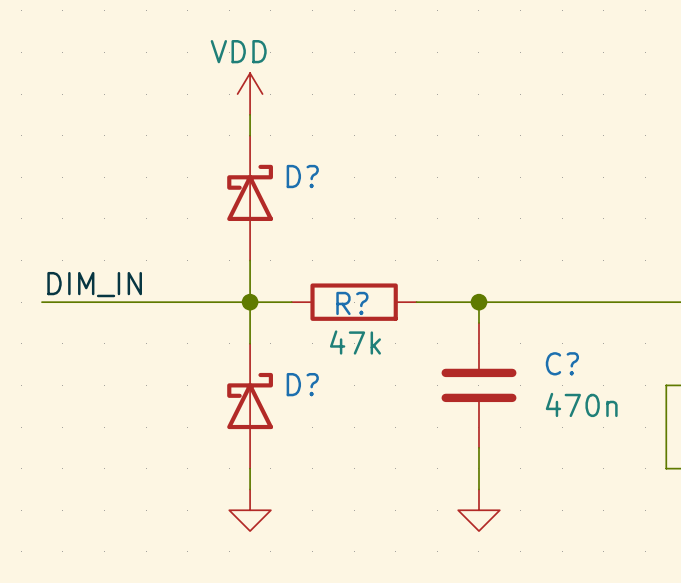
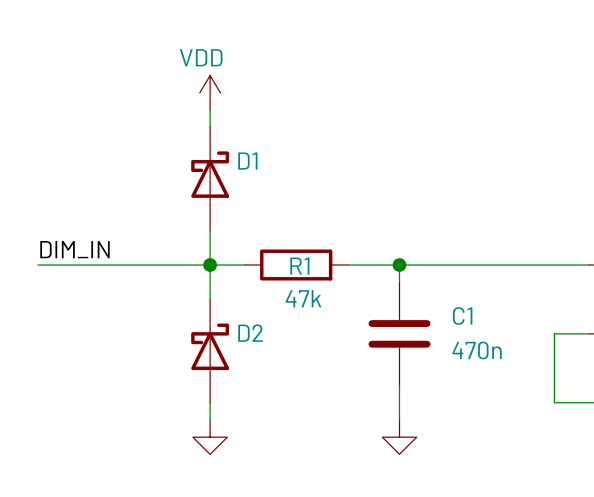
D? name: D? (302, 176) -> D1 (247, 161)
R? name: R? (352, 303) -> R1 (299, 266)
C? name: C? (562, 363) -> C1 (462, 316)
D? name: D? (302, 384) -> D2 (250, 333)

